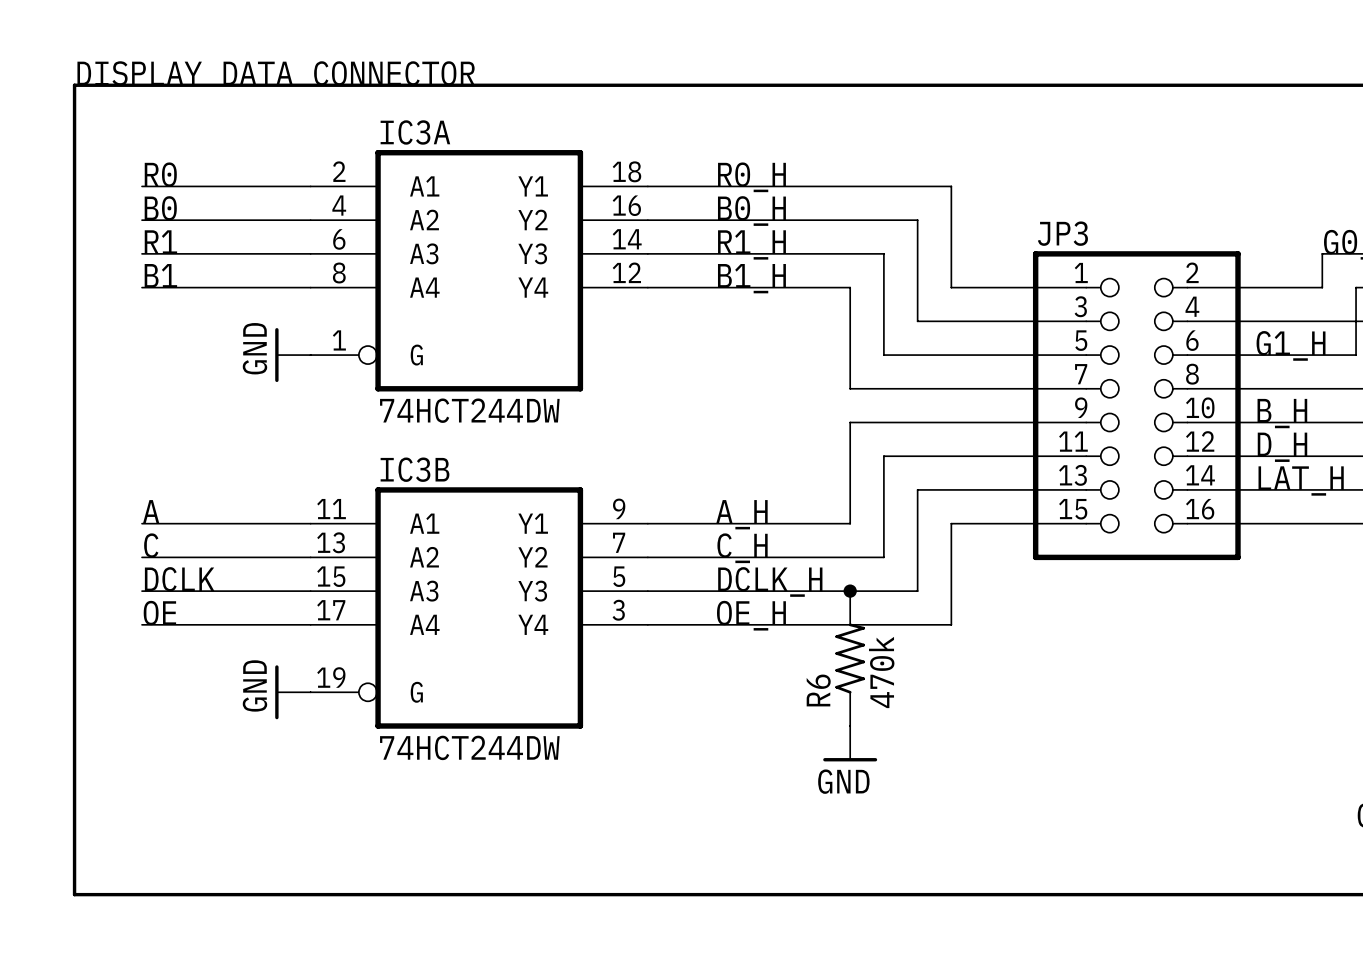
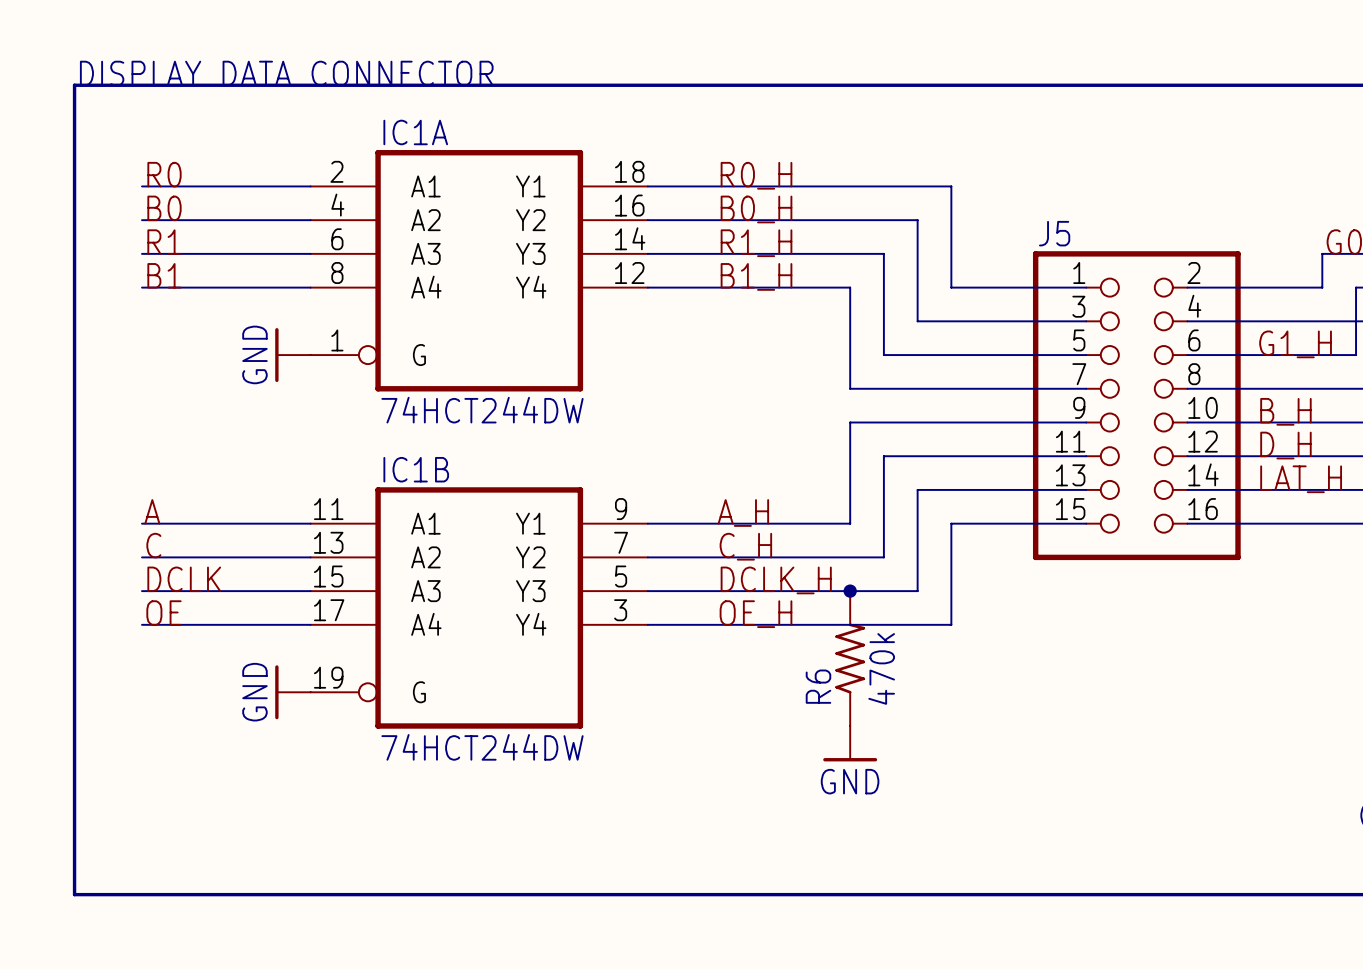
IC3A name: IC3A (415, 132) -> IC1A (415, 132)
JP3 name: JP3 (1062, 233) -> J5 (1054, 233)
IC3B name: IC3B (415, 469) -> IC1B (416, 469)

